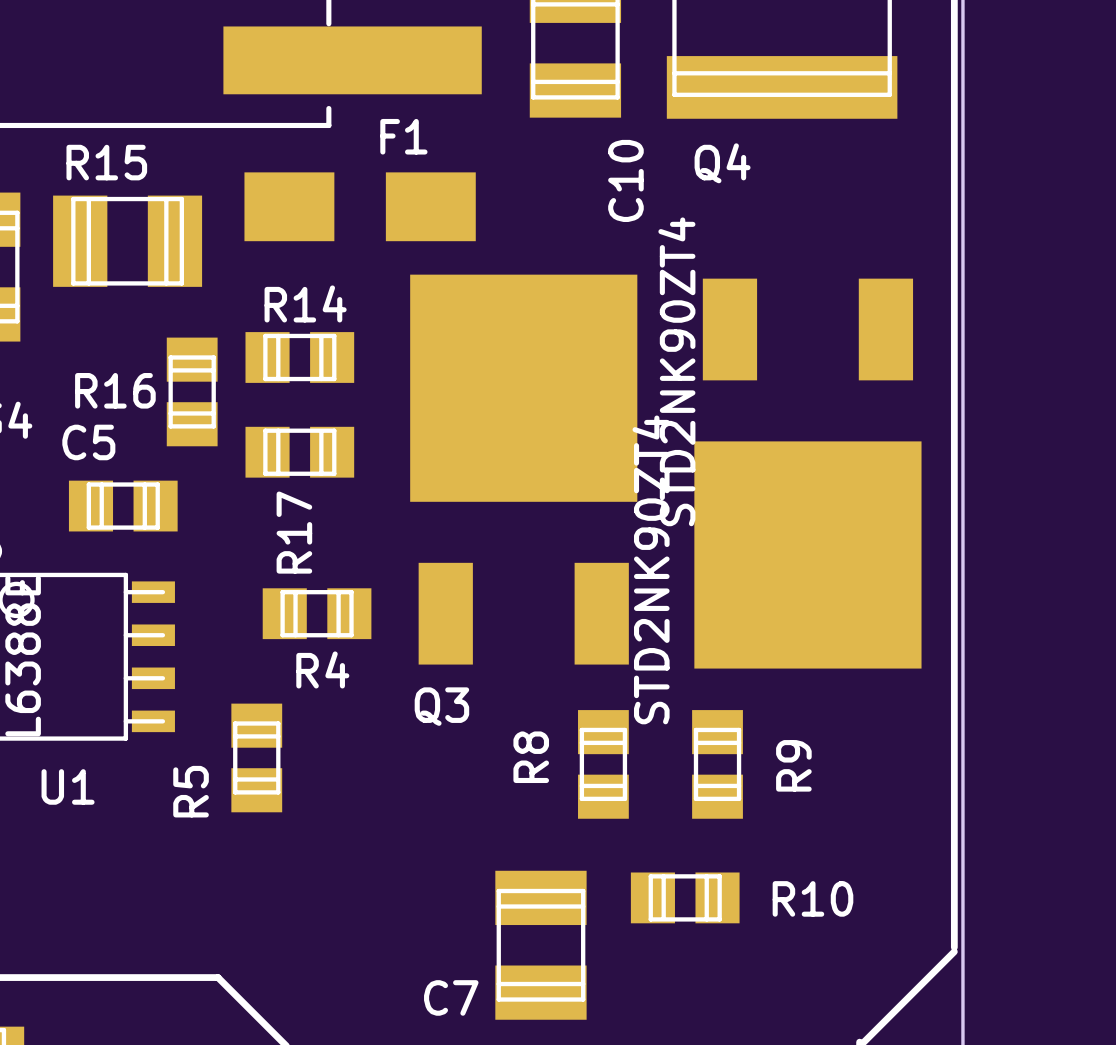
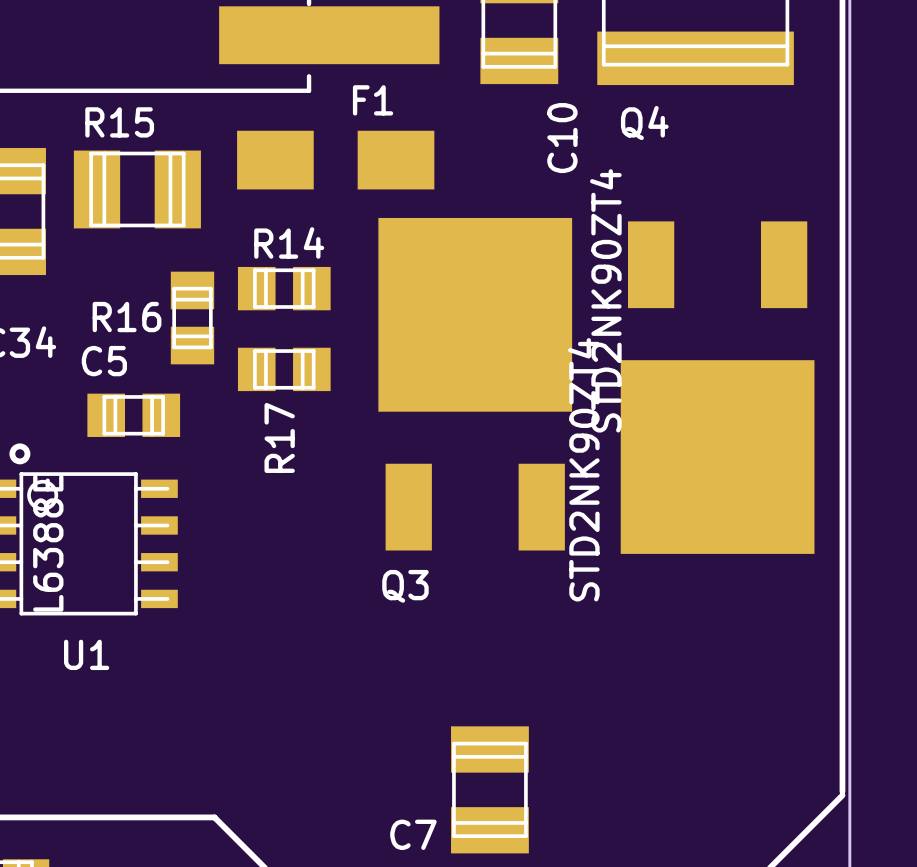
R4: (317, 613) -> none
R5: (256, 757) -> none
R8: (603, 764) -> none
R9: (717, 764) -> none
R10: (685, 897) -> none

